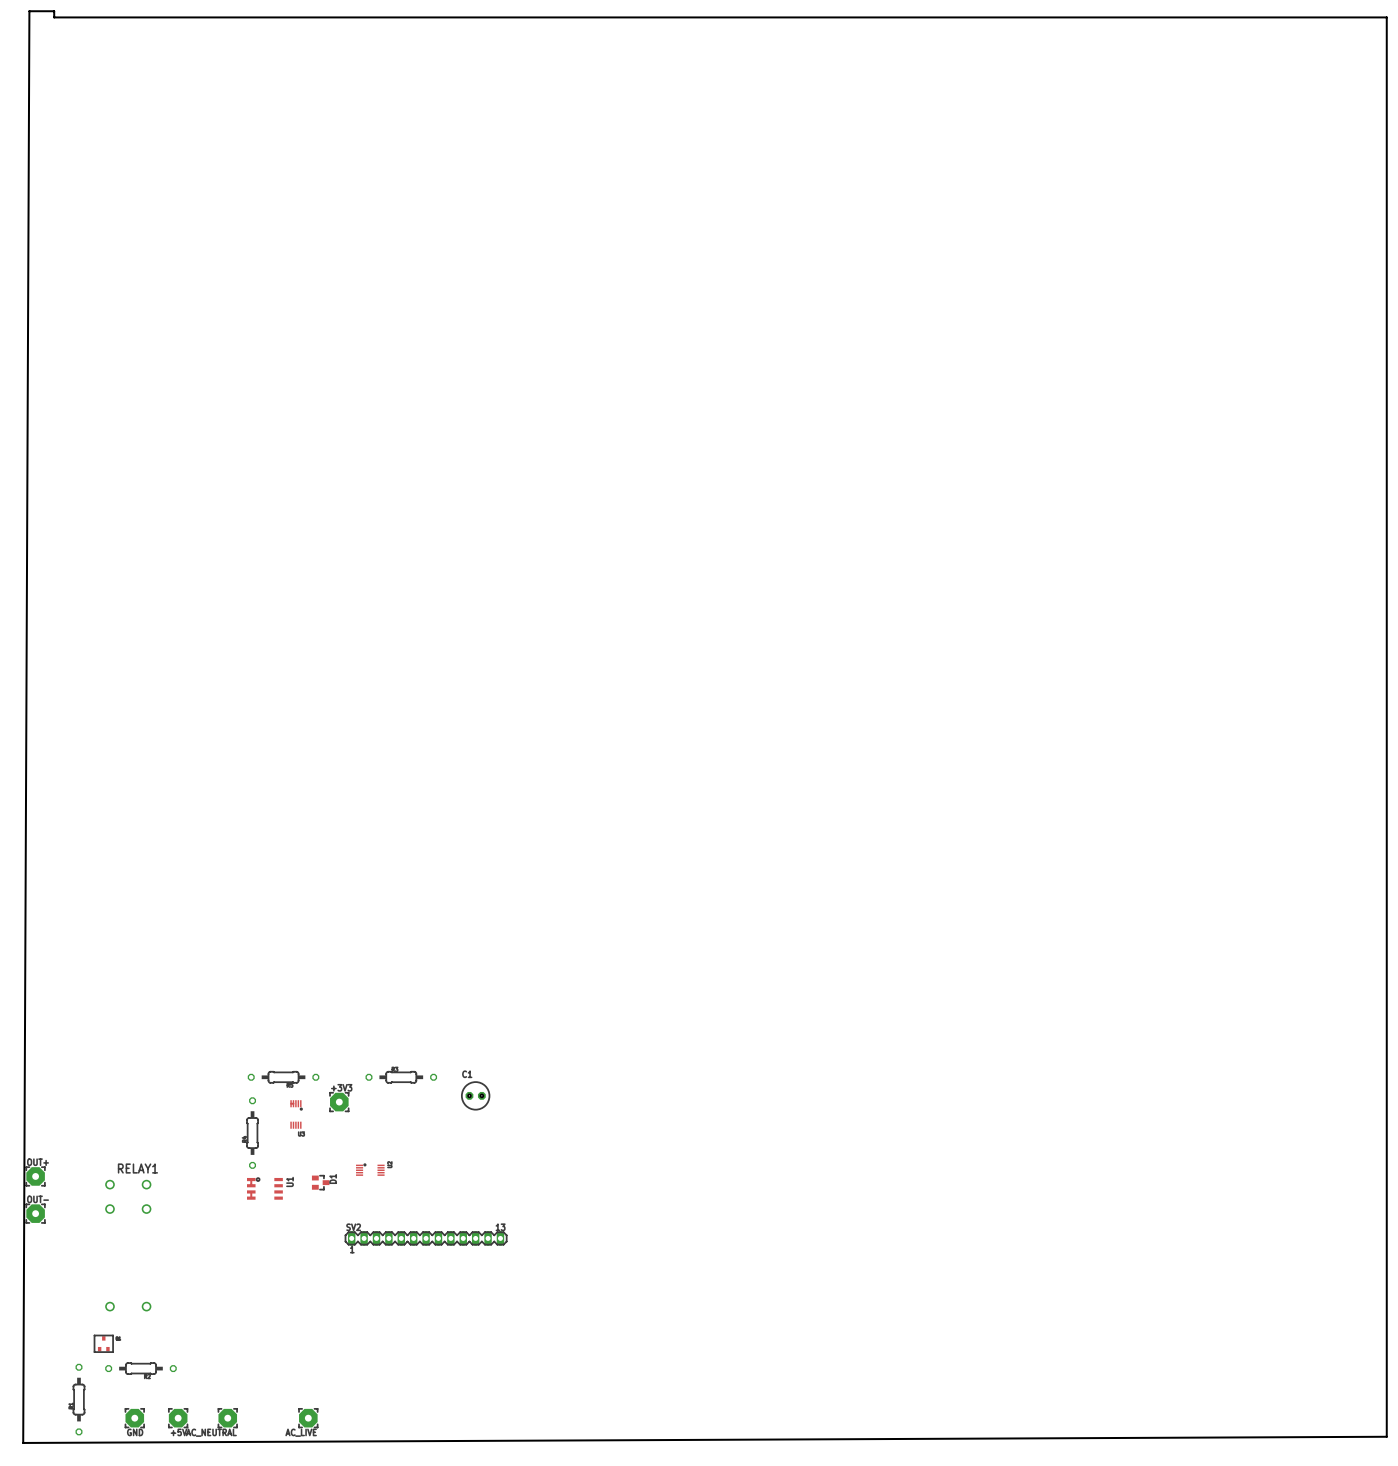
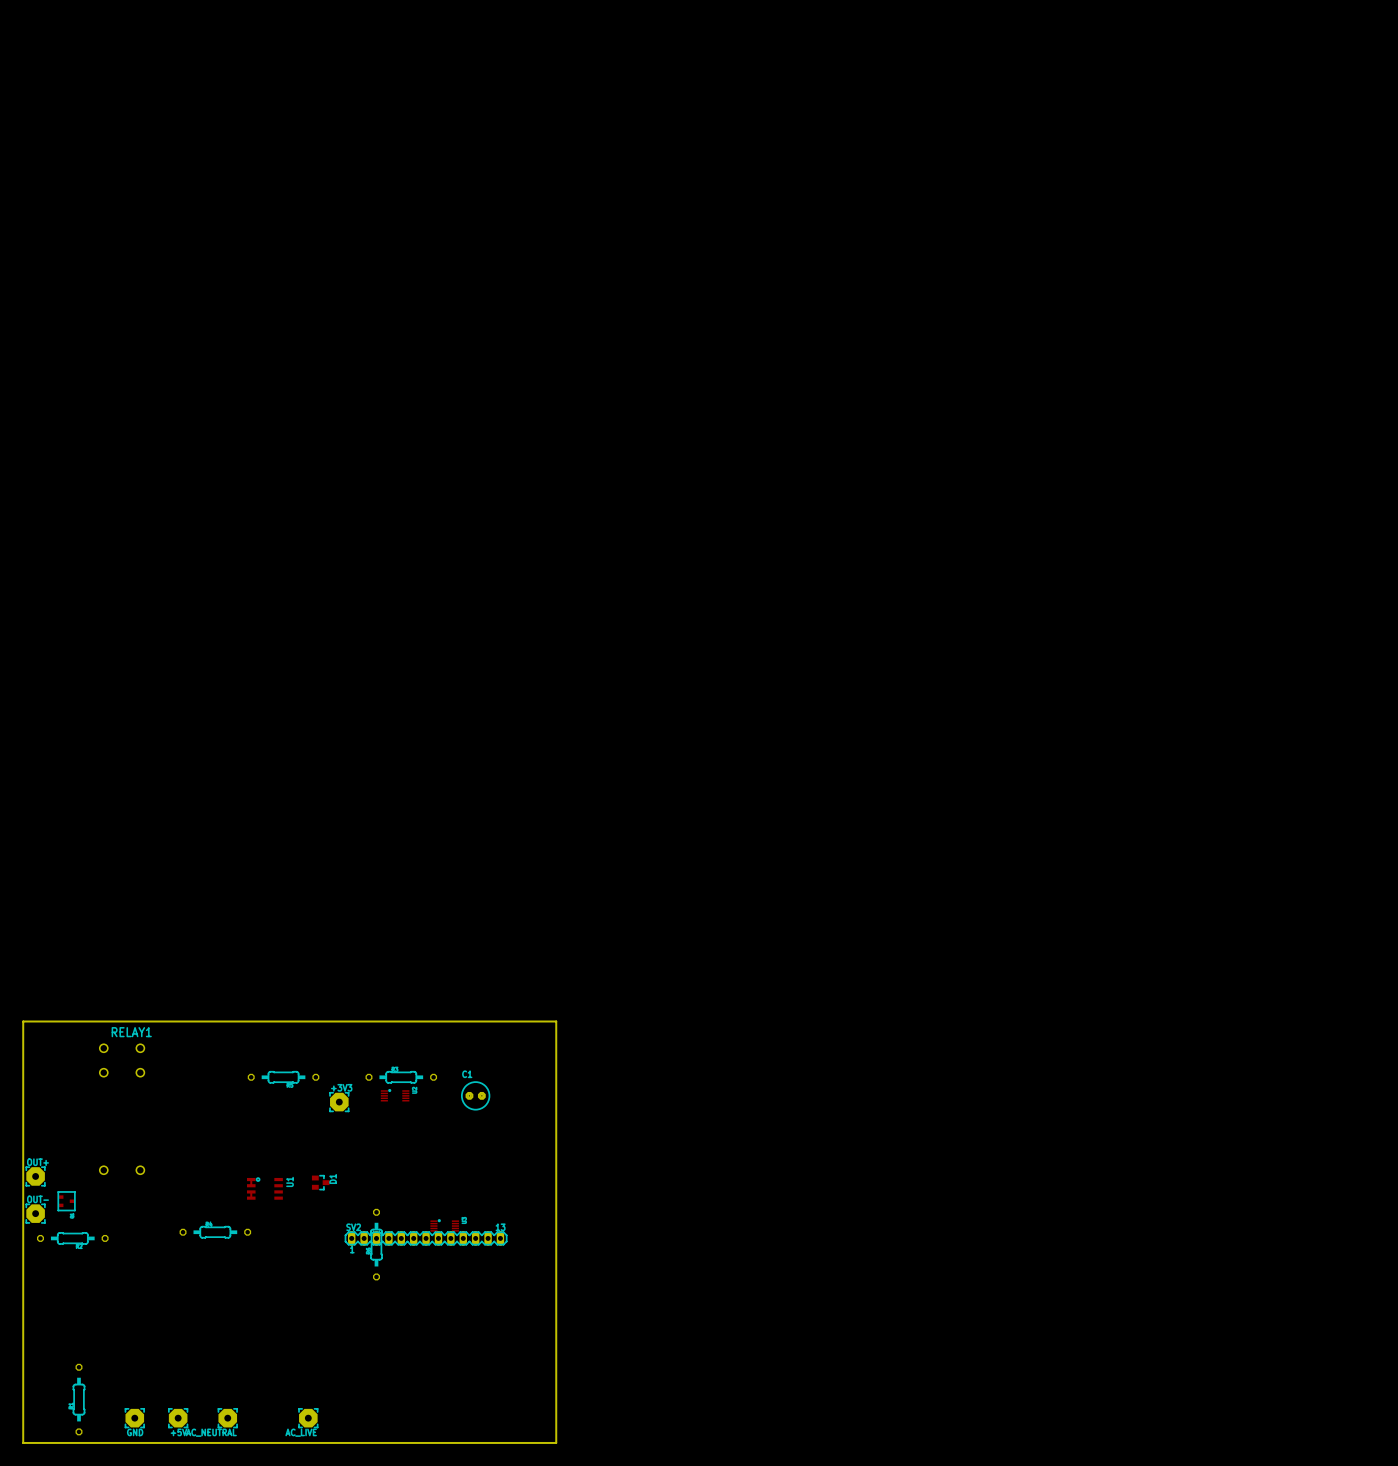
board edge: (29, 11) (54, 11) (54, 17) (1386, 17) (1386, 1436) (23, 1442) (29, 11) -> none
board edge: none -> (23, 1021) (556, 1021) (556, 1442) (23, 1442) (23, 1021)
top track: (291, 1103) (293, 1103) -> none
part rotation: 0° (296, 1114) -> 90° counterclockwise (444, 1225)
part position: (296, 1114) -> (444, 1225)
part rotation: 0° (252, 1133) -> 90° clockwise (215, 1232)
part position: (252, 1133) -> (215, 1232)
part position: (370, 1169) -> (395, 1095)
part: none -> (376, 1244)
RELAY1 position: (128, 1245) -> (122, 1109)
part rotation: 0° (103, 1343) -> 90° clockwise (66, 1201)
part position: (103, 1343) -> (66, 1201)
part position: (140, 1368) -> (72, 1238)

